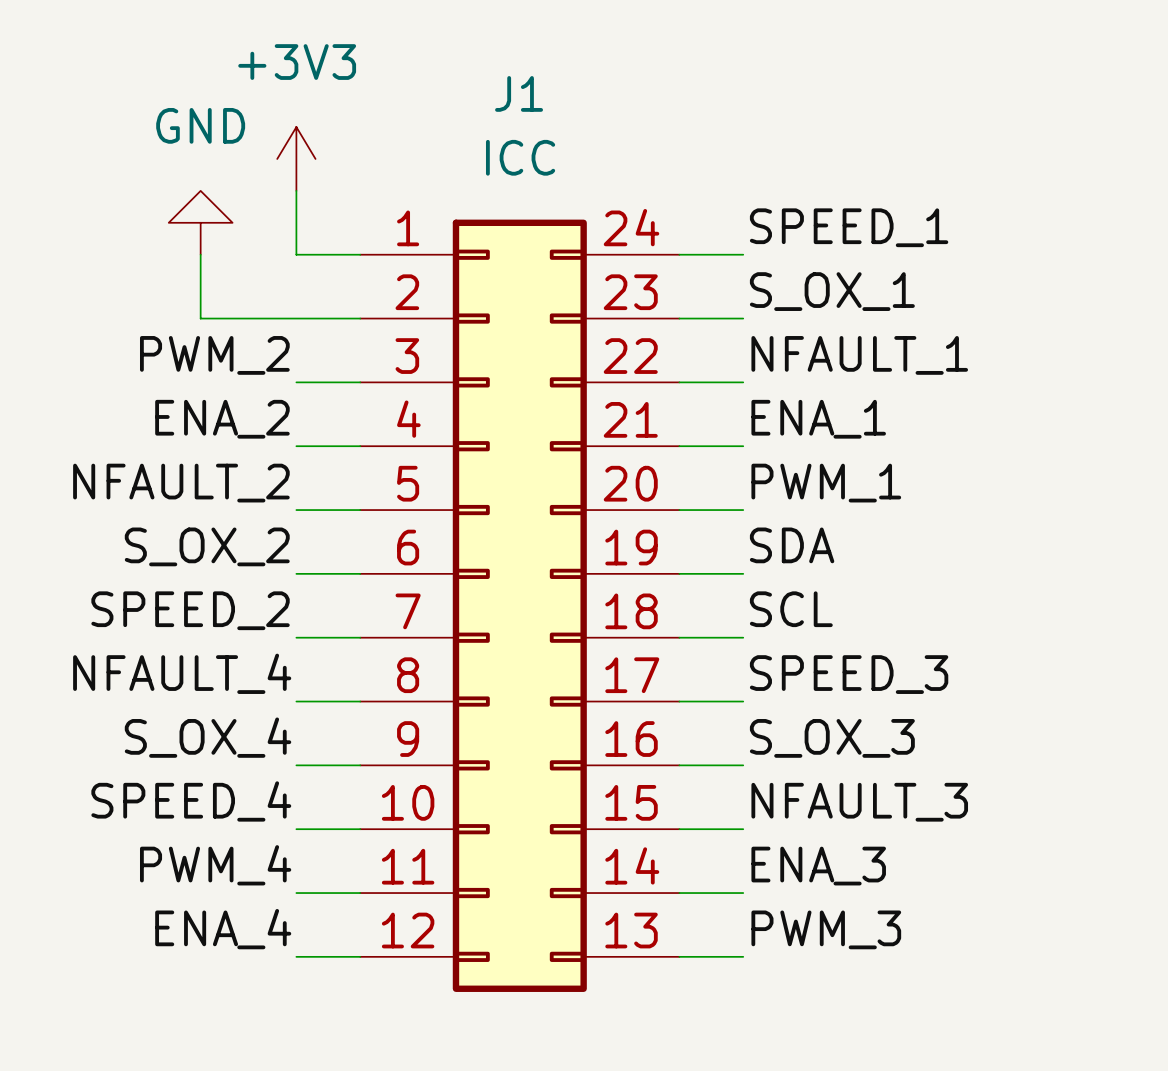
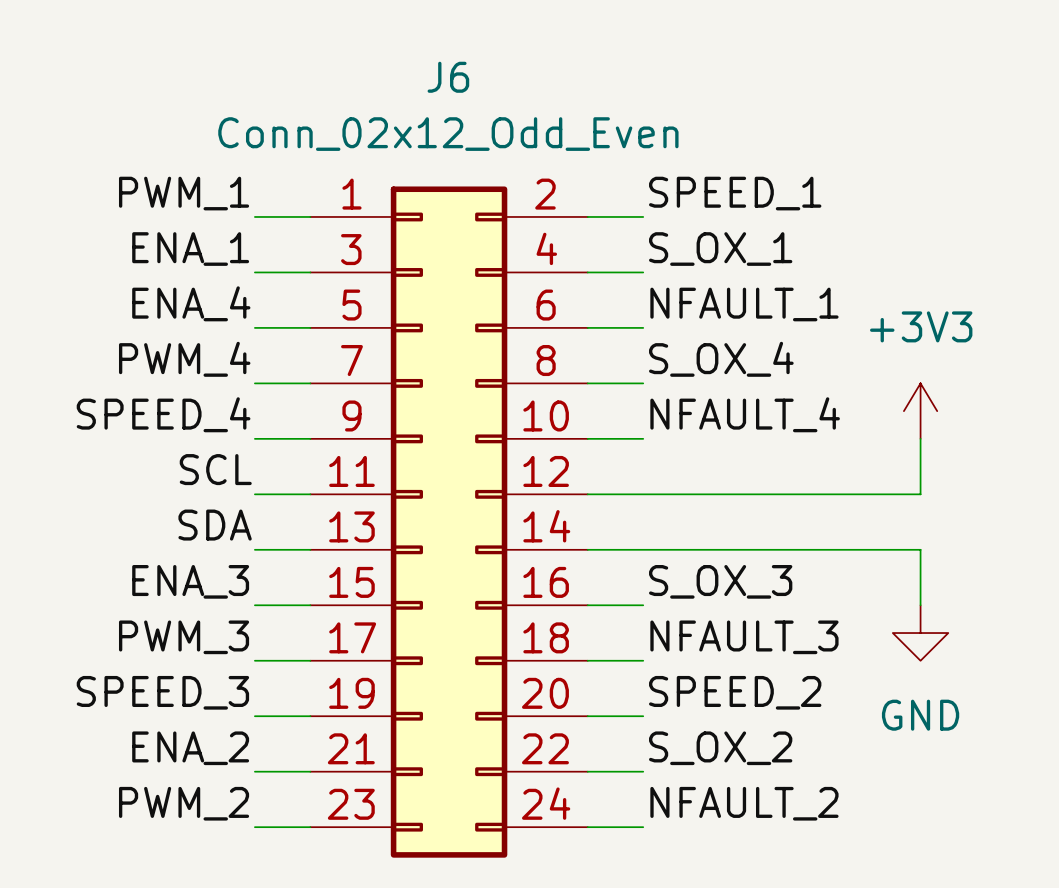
J1 name: J1 (519, 93) -> J6 (448, 77)
J1 value: ICC (520, 157) -> Conn_02x12_Odd_Even (448, 134)
power symbol: +3V3 (296, 158) -> none
wire: (296, 190) (296, 254) -> none
J1 symbol: [360, 219, 680, 992] -> [310, 186, 588, 858]
power symbol: GND (200, 222) -> none
label: none -> PWM_1 (184, 193)
wire: (200, 254) (200, 318) (296, 318) -> none
label: none -> ENA_1 (190, 249)
label: PWM_2 (214, 355) -> ENA_4 (191, 303)
label: ENA_2 (222, 419) -> PWM_4 (184, 359)
label: ENA_1 (818, 419) -> S_OX_4 (721, 359)
power symbol: none -> +3V3 (920, 411)
label: NFAULT_2 (181, 483) -> SPEED_4 (163, 414)
label: PWM_1 (826, 483) -> NFAULT_4 (745, 414)
wire: none -> (920, 438) (920, 494) (643, 494)
label: SDA (792, 545) -> none
label: S_OX_2 (207, 546) -> SCL (215, 469)
label: SCL (791, 609) -> none
label: SPEED_2 (190, 610) -> SDA (215, 525)
wire: none -> (643, 549) (920, 549) (920, 605)
label: NFAULT_4 (182, 673) -> ENA_3 (190, 581)
label: SPEED_3 (849, 674) -> S_OX_3 (720, 581)
power symbol: none -> GND (920, 633)
label: S_OX_4 (208, 737) -> PWM_3 (184, 637)
label: S_OX_3 (832, 738) -> NFAULT_3 (744, 637)
label: SPEED_4 (191, 801) -> SPEED_3 (162, 692)
label: NFAULT_3 (859, 802) -> SPEED_2 (735, 692)
label: PWM_4 (215, 865) -> ENA_2 (190, 748)
label: ENA_3 (818, 866) -> S_OX_2 (720, 748)
label: ENA_4 (223, 929) -> PWM_2 (184, 803)
label: PWM_3 (826, 929) -> NFAULT_2 (744, 803)

